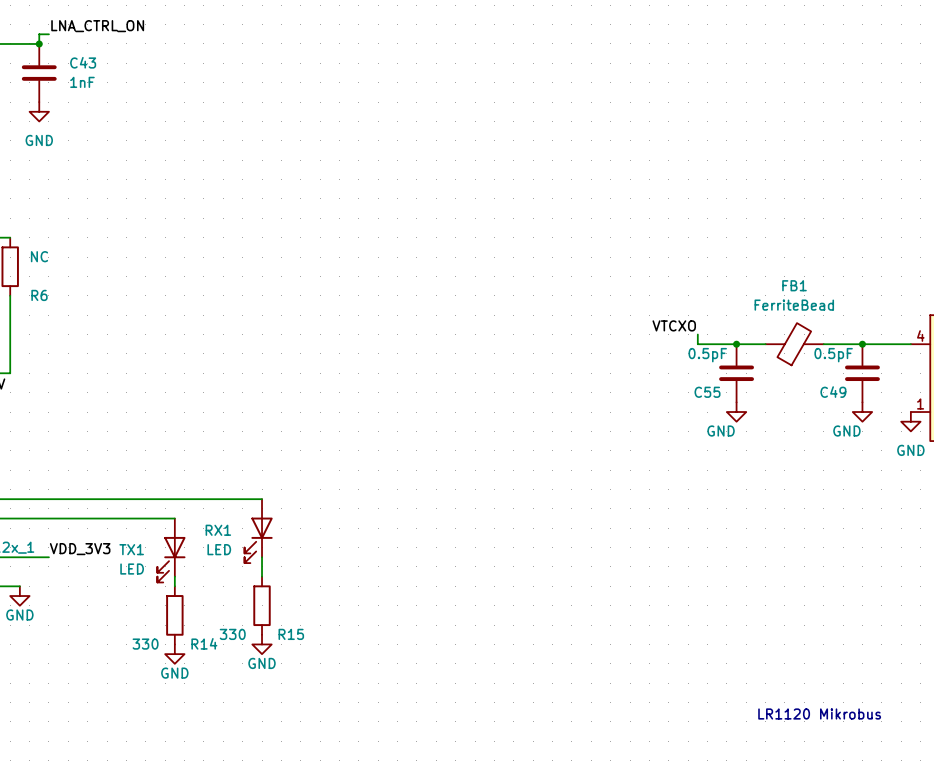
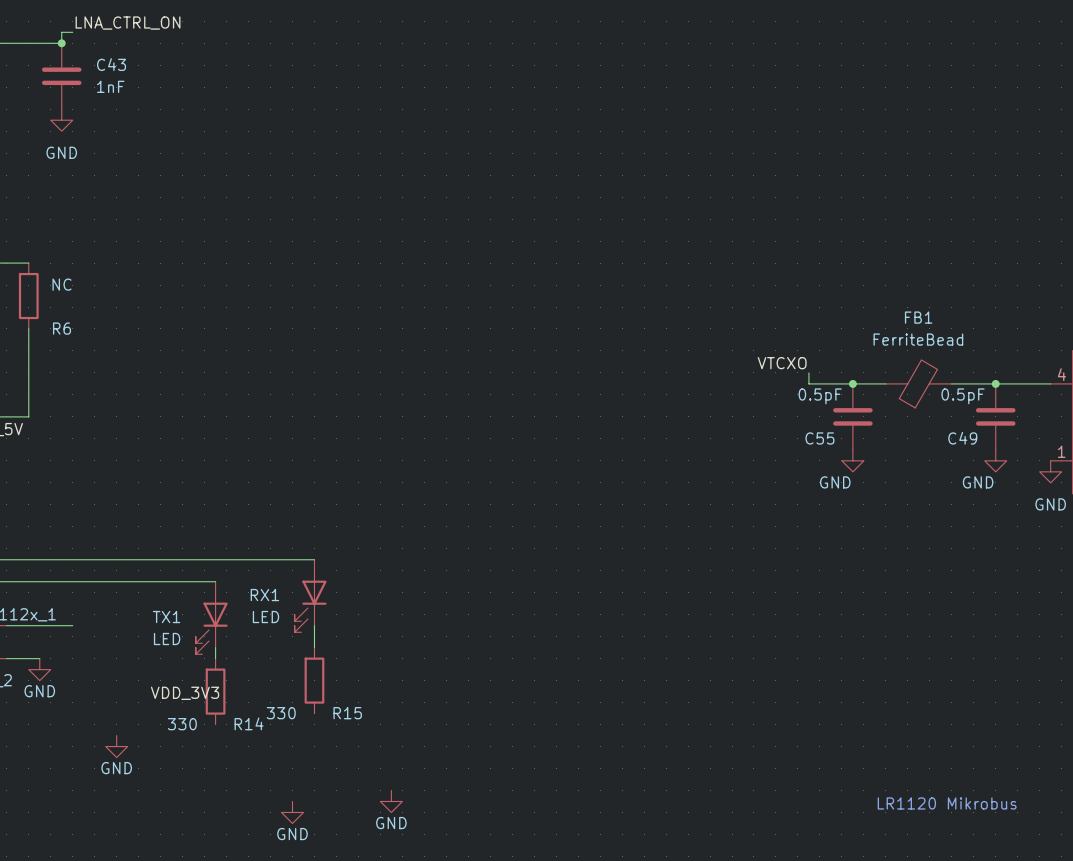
label position: VDD_3V3 (80, 549) -> VDD_3V3 (185, 693)
power symbol: GND (262, 644) -> none
power symbol: GND (174, 654) -> none
power symbol: none -> GND (116, 746)
power symbol: none -> GND (391, 801)
power symbol: none -> GND (292, 812)

